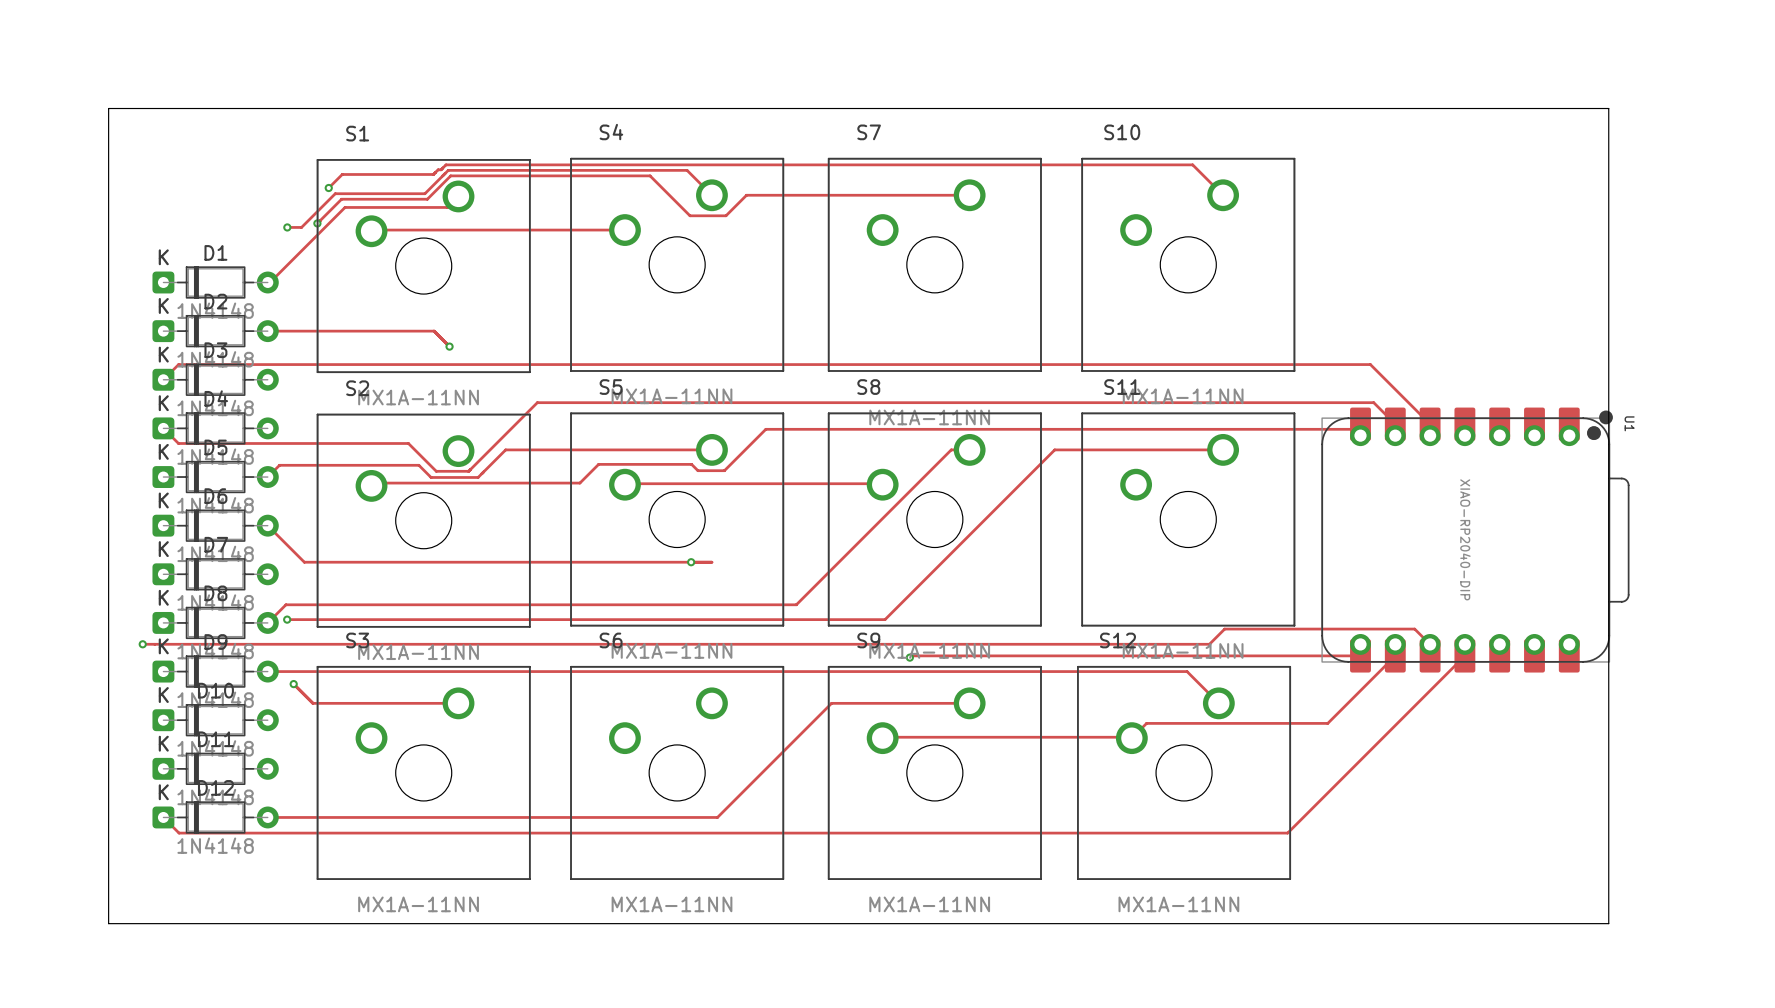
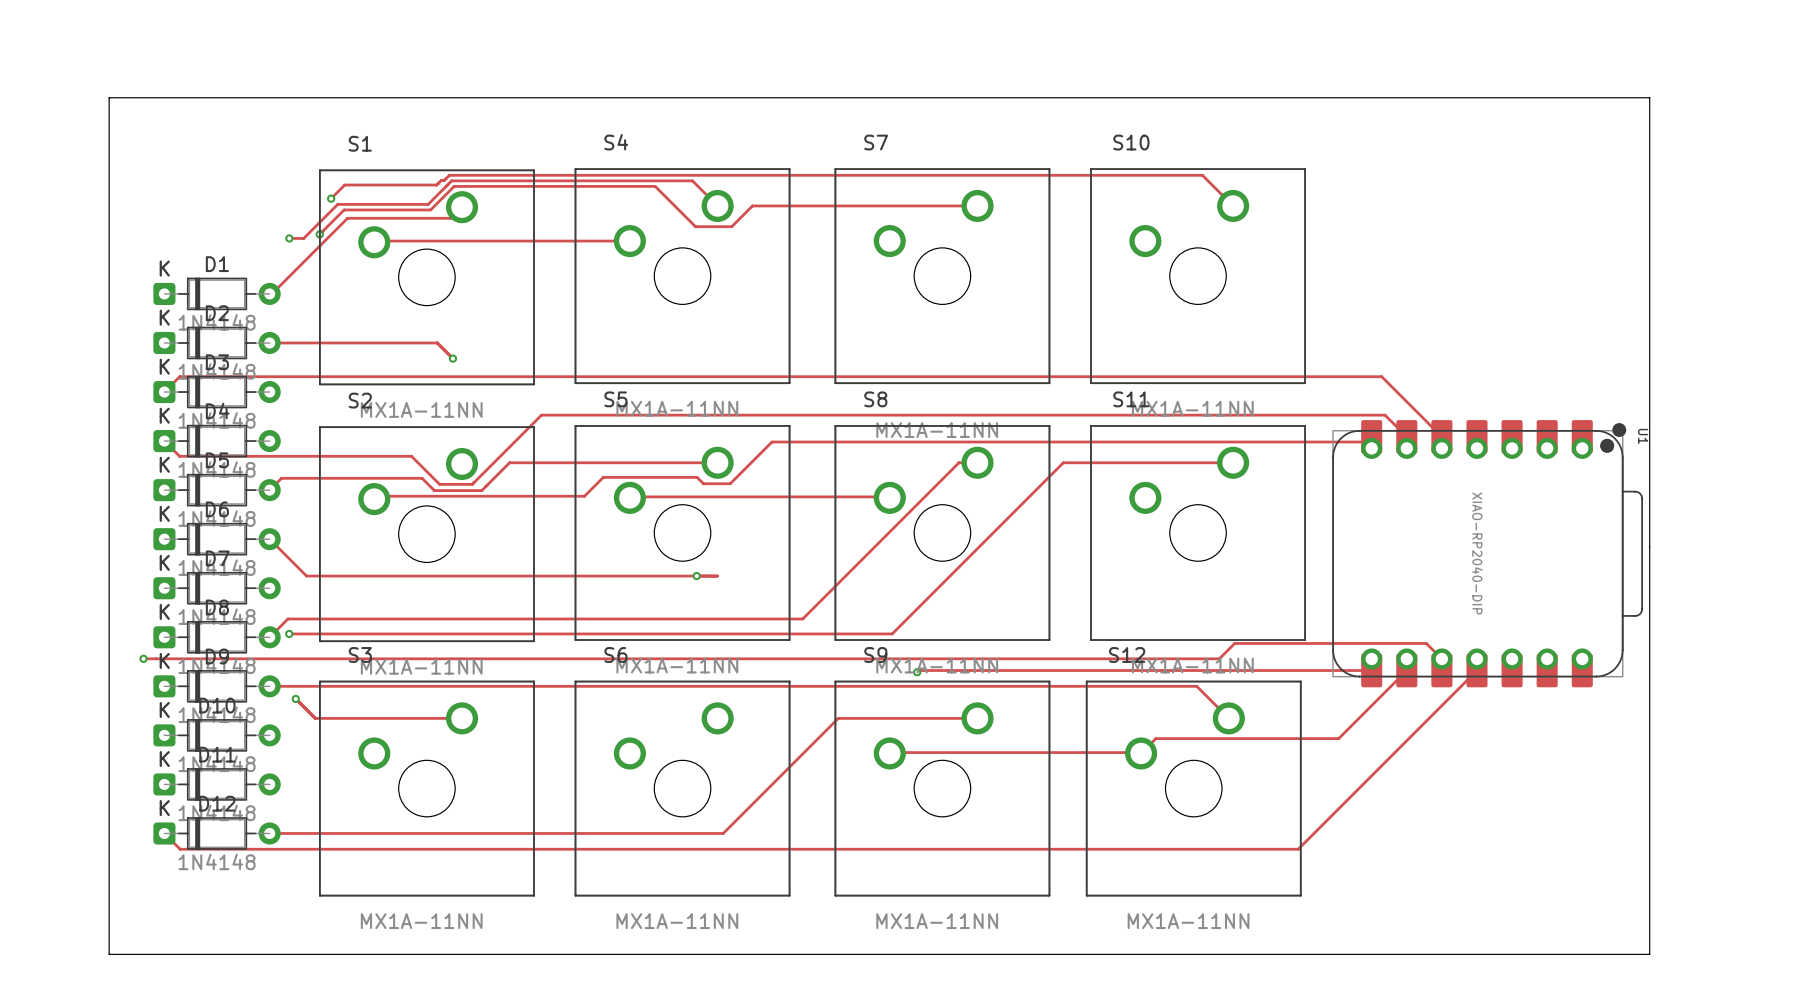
board edge: (108, 108) (1608, 108) (1608, 923) (108, 923) -> (109, 118) (109, 97) (1649, 97) (1649, 954) (109, 954) (109, 940)

